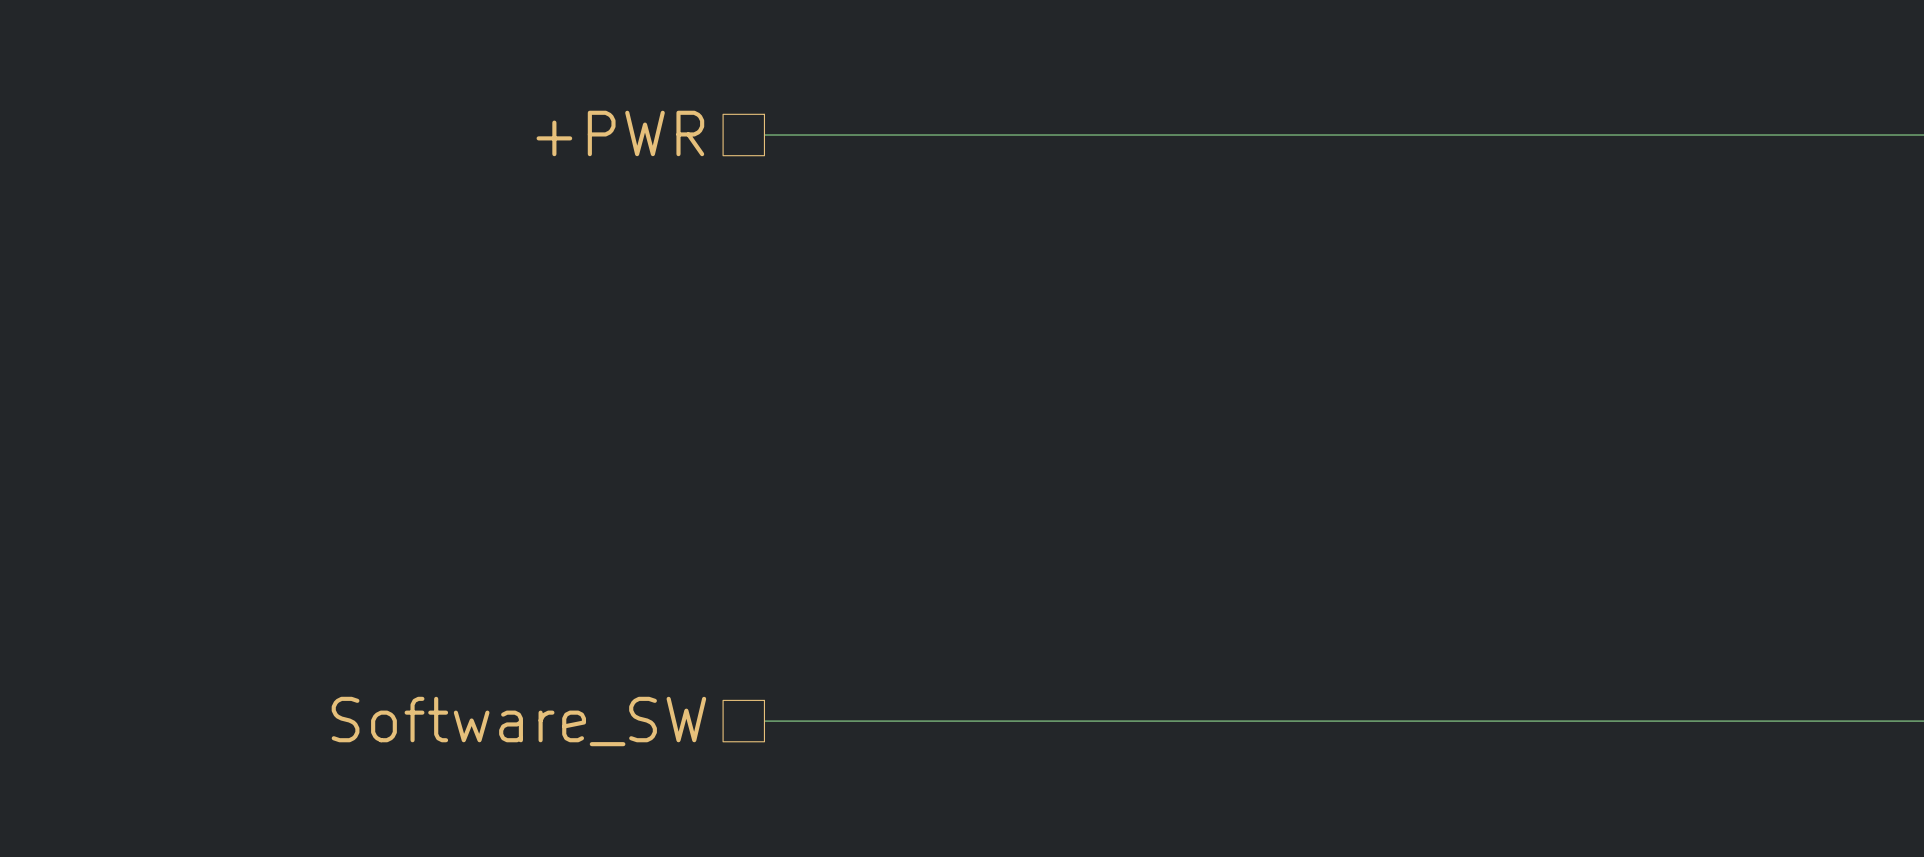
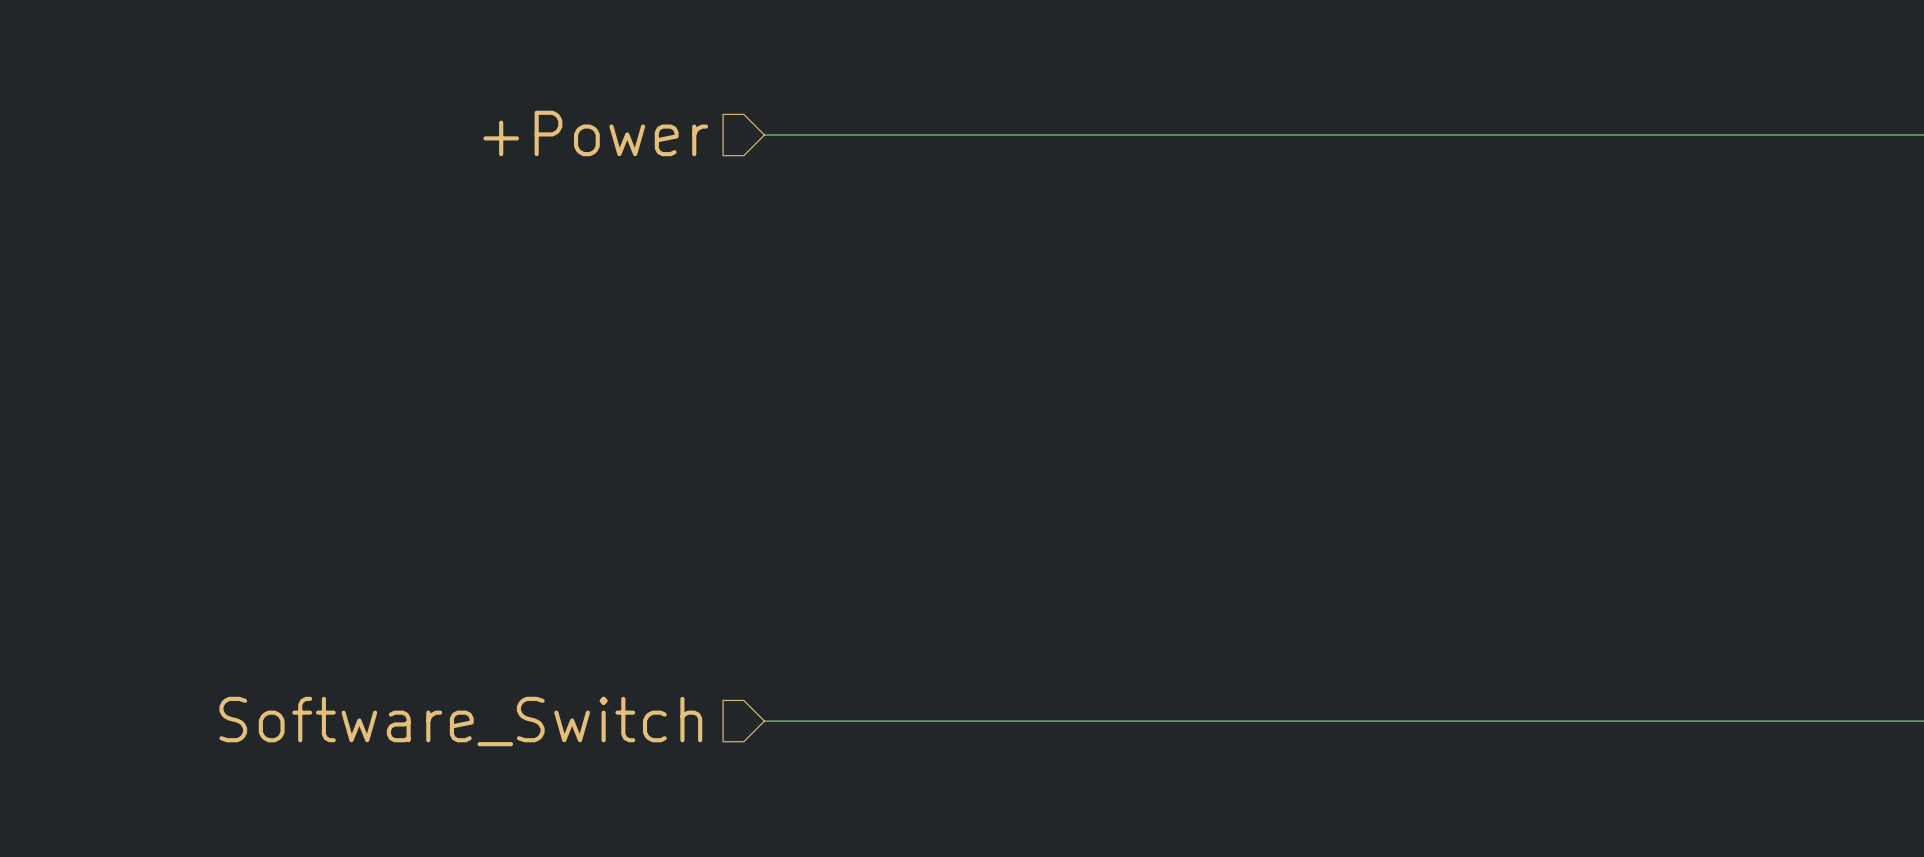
hierarchical label shape: passive (620, 133) -> input (595, 133)
hierarchical label: +PWR (620, 133) -> +Power (595, 133)
hierarchical label shape: passive (518, 721) -> input (460, 721)
hierarchical label: Software_SW (518, 721) -> Software_Switch (460, 721)

